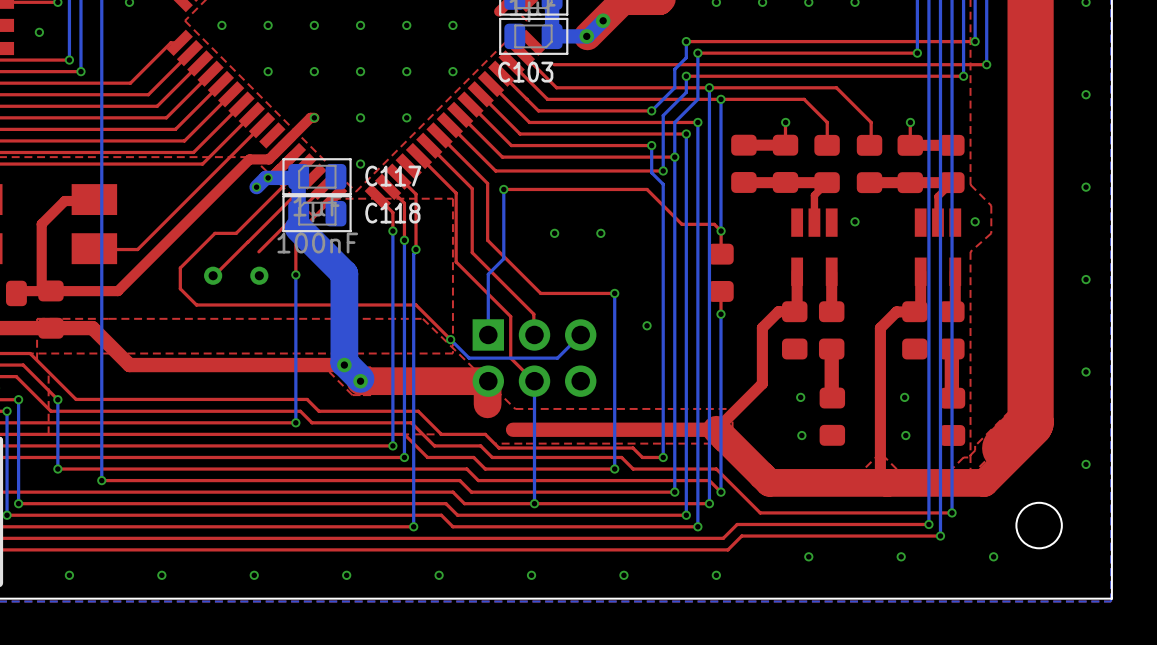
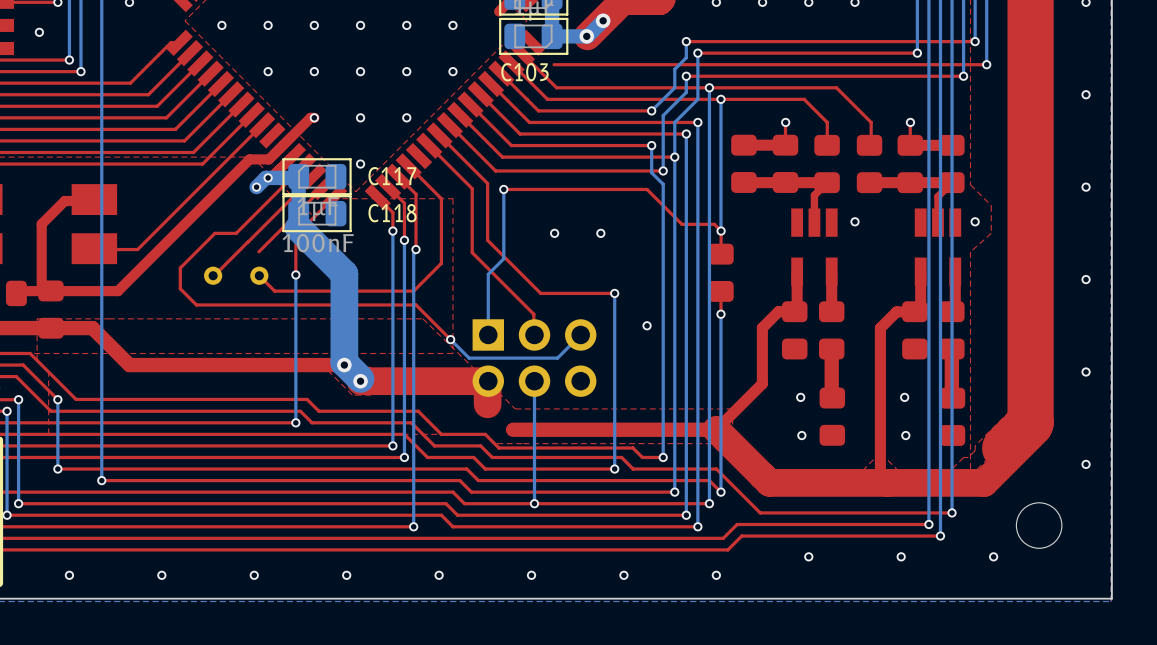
top track: (419, 156) (456, 193) (456, 261) (510, 316) (510, 358) (536, 383) -> none
top track: none -> (409, 166) (441, 198) (441, 263) (413, 291) (274, 291) (259, 275)

